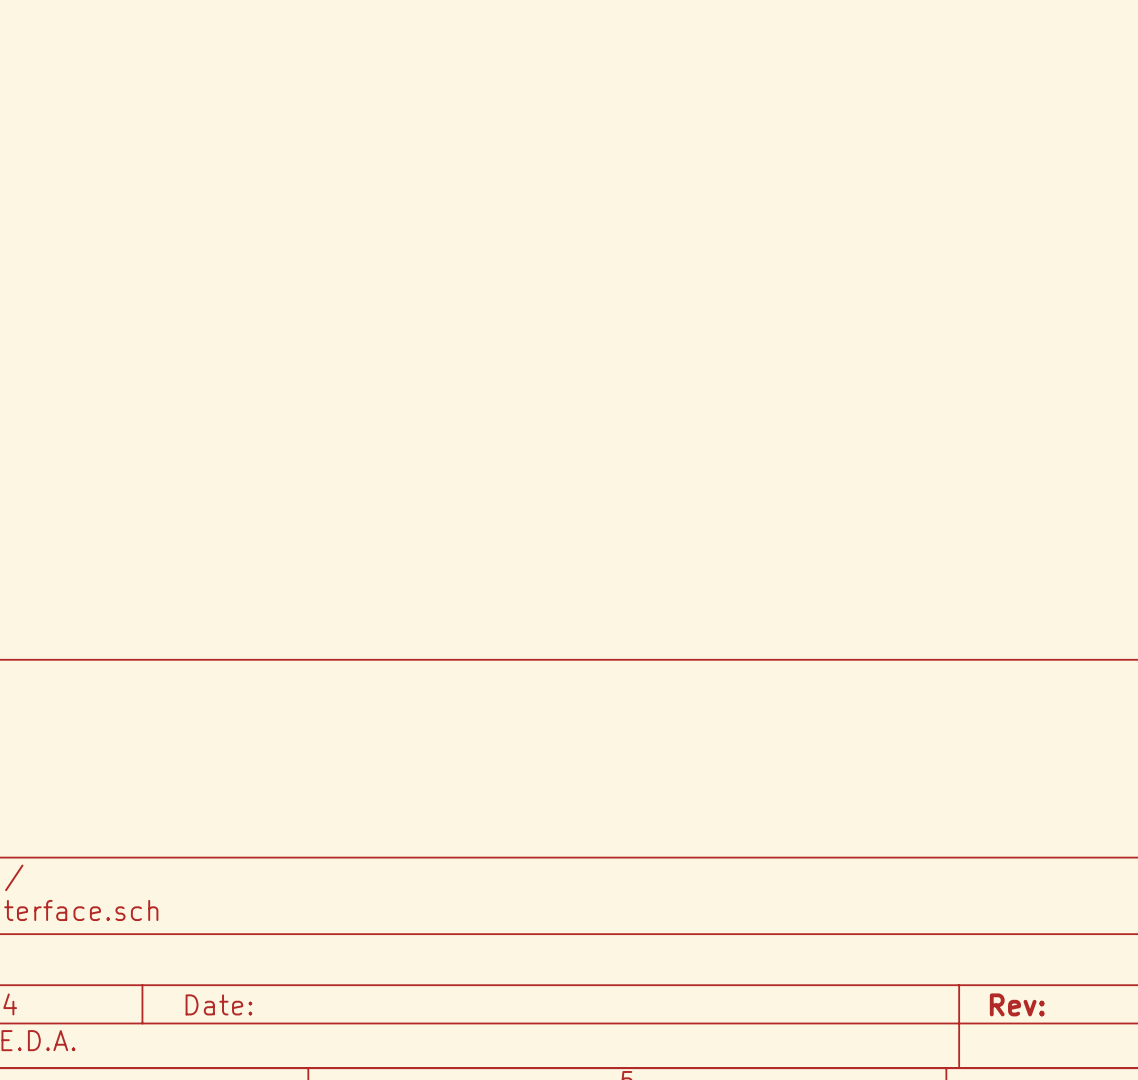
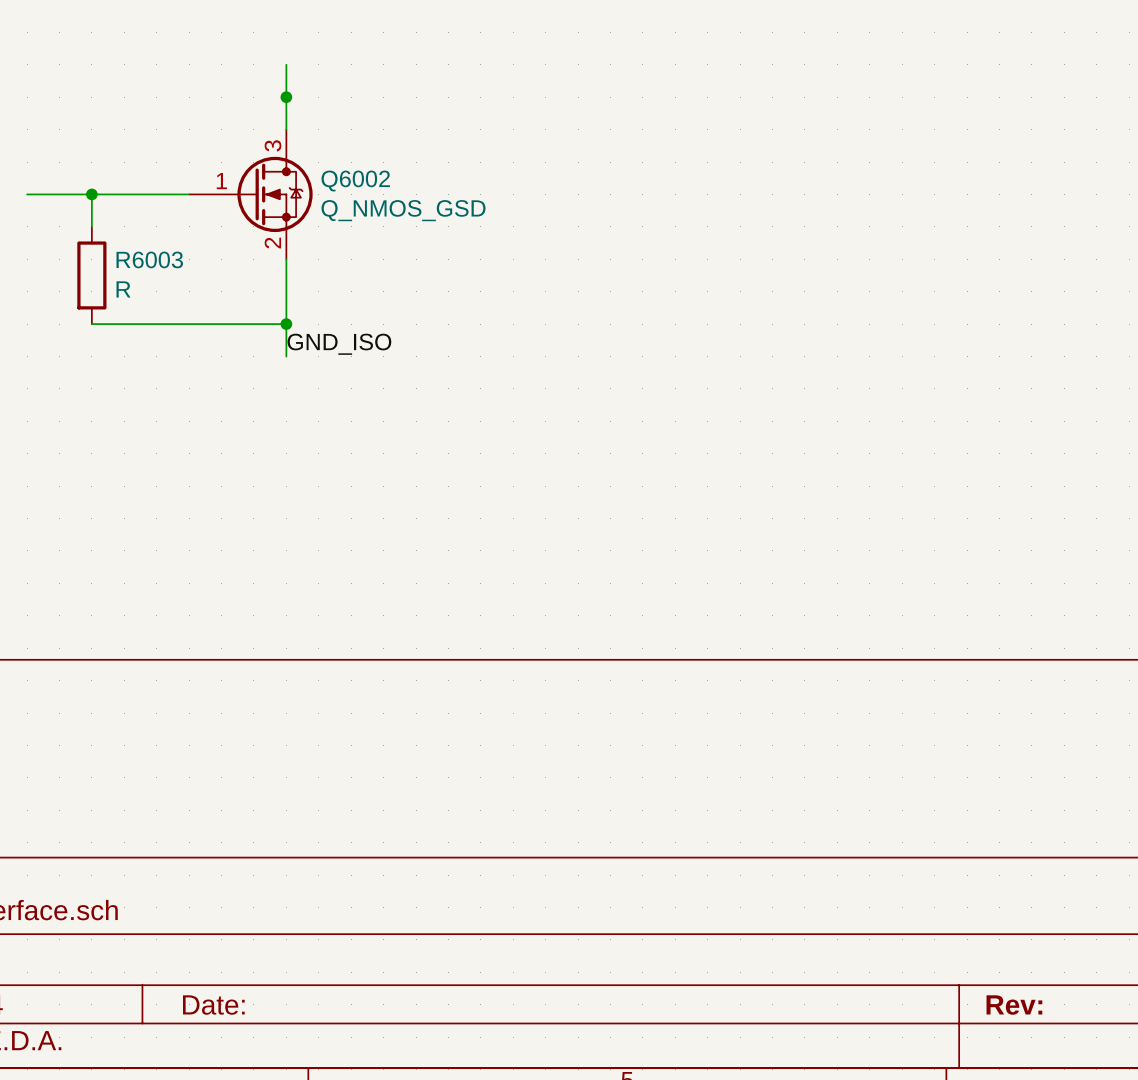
wire: none -> (286, 64) (286, 129)
junction: none -> (286, 97)
wire: none -> (27, 194) (189, 194)
wire: none -> (91, 194) (91, 226)
junction: none -> (91, 194)
Q6002: none -> Q_NMOS_GSD (250, 194)
wire: none -> (286, 259) (286, 356)
R6003: none -> R (91, 275)
wire: none -> (91, 324) (286, 324)
junction: none -> (286, 324)
label: none -> GND_ISO (339, 344)

